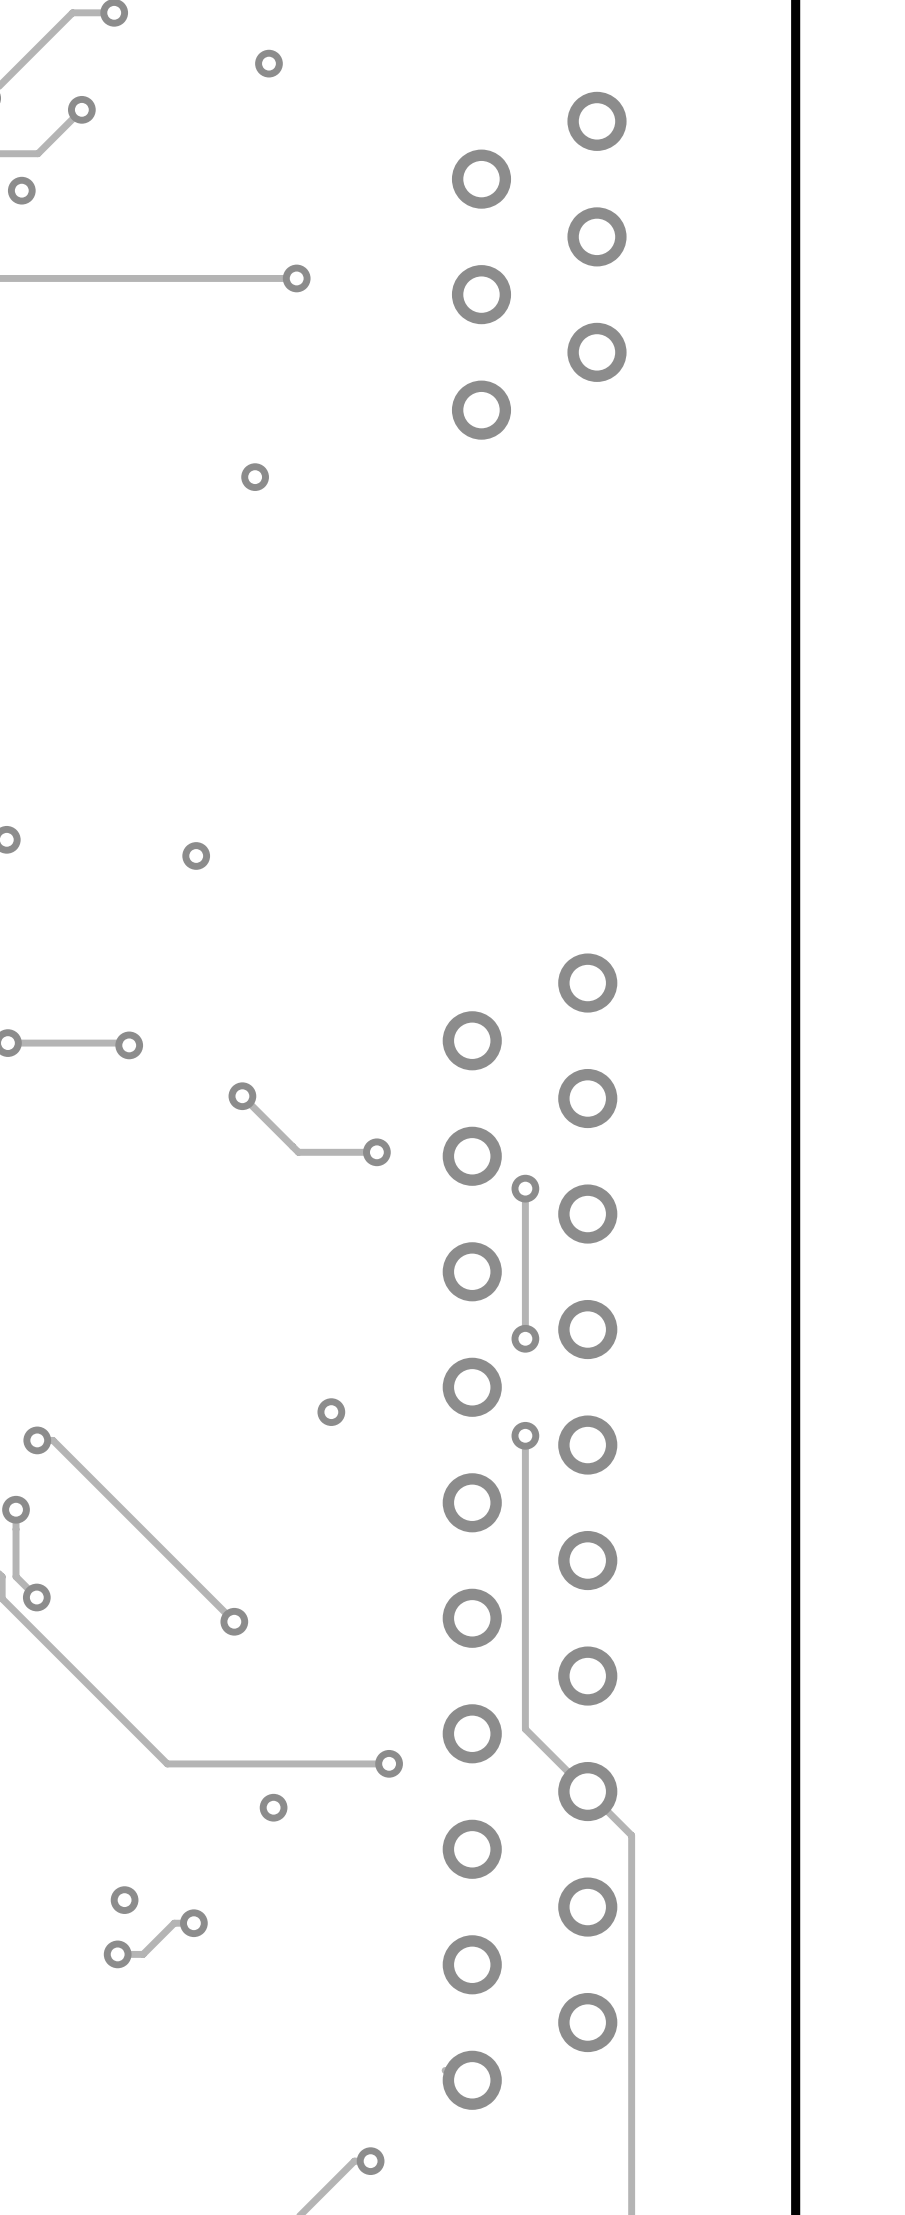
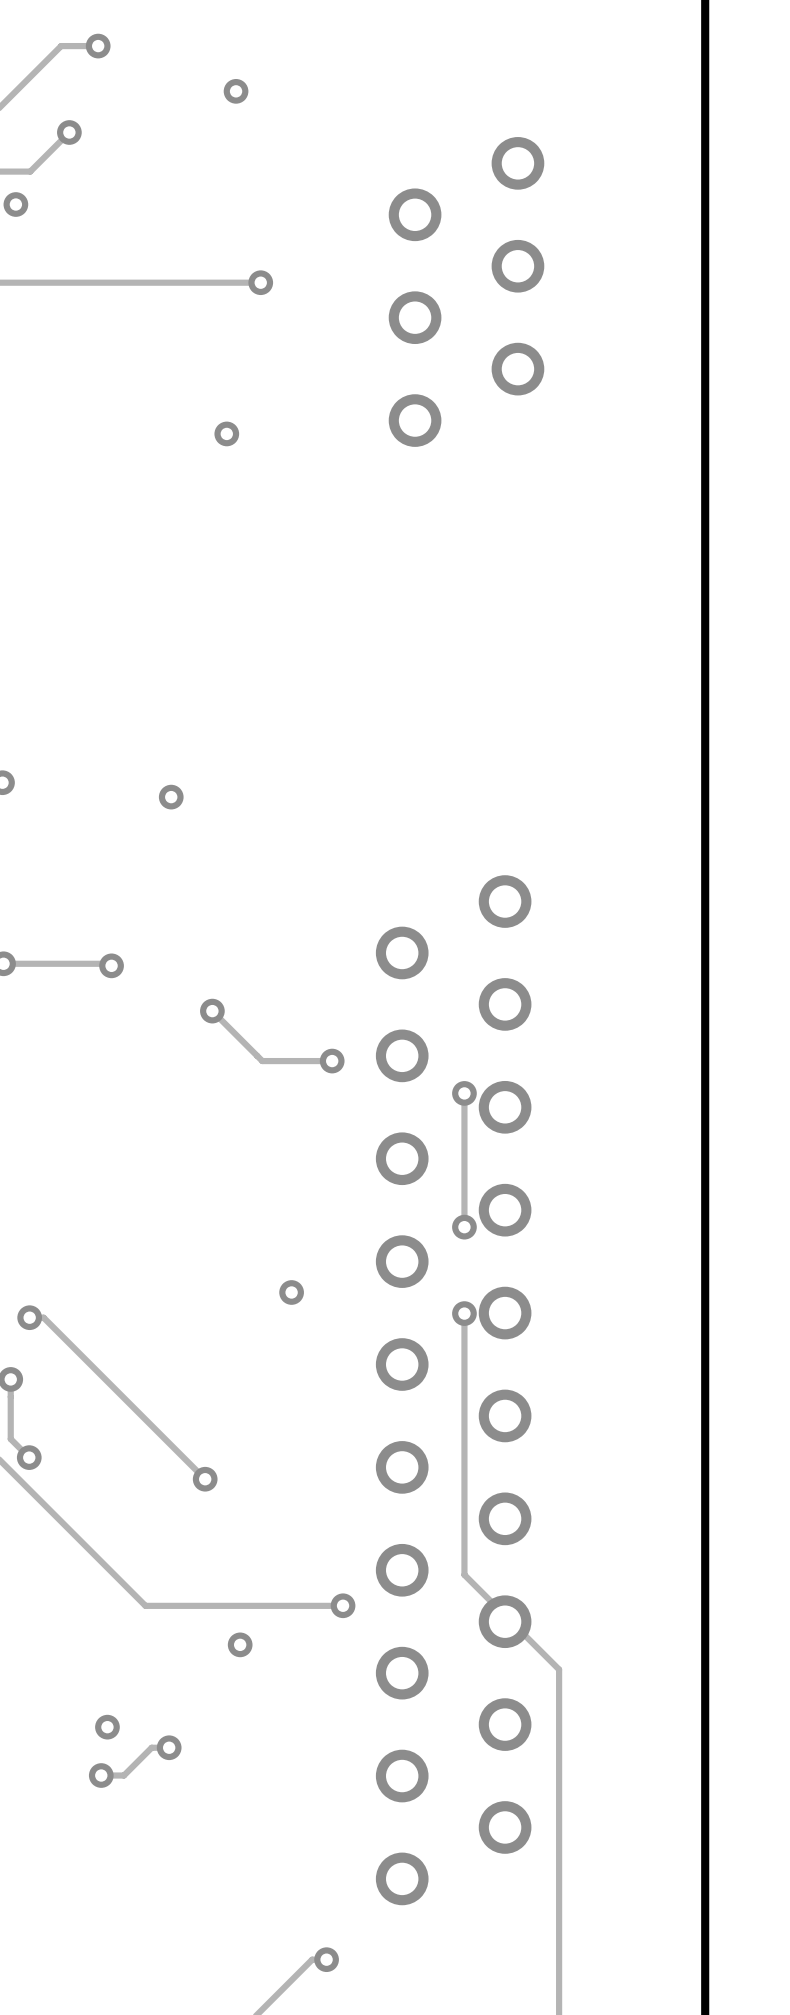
part position: (539, 265) -> (466, 291)
via position: (255, 477) -> (226, 433)
part position: (530, 1531) -> (453, 1390)

